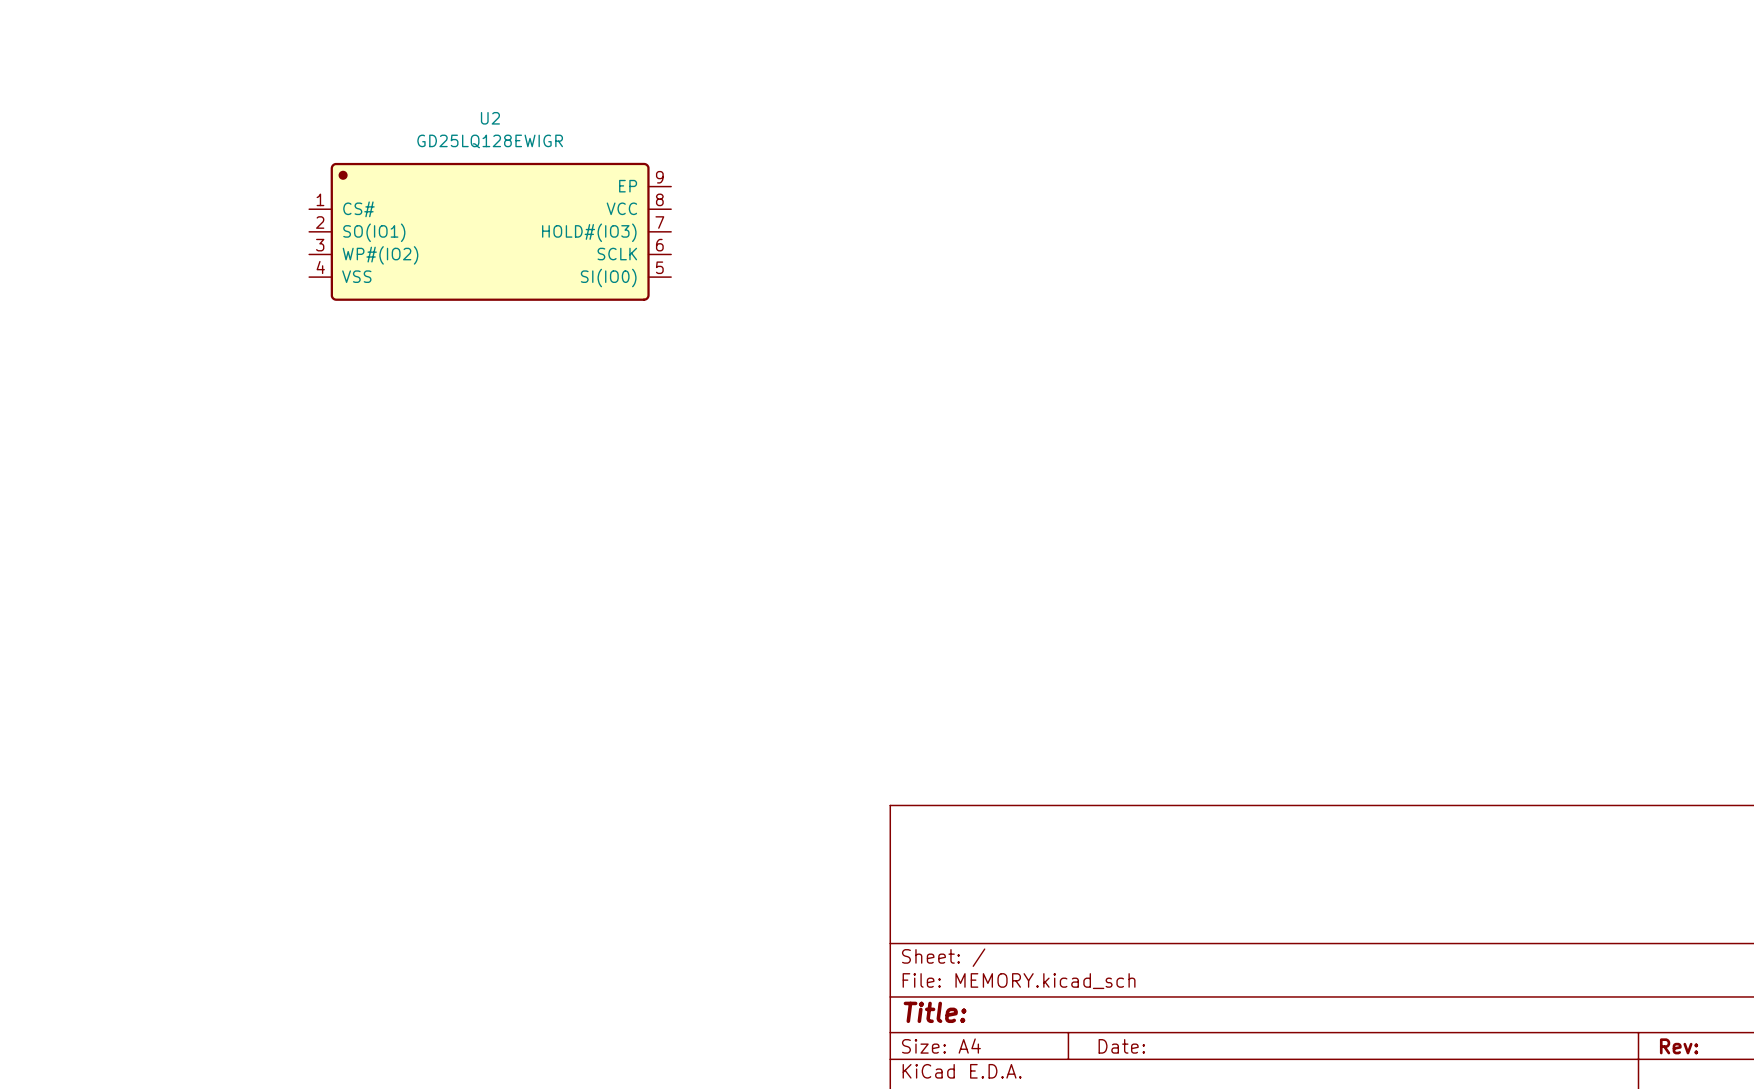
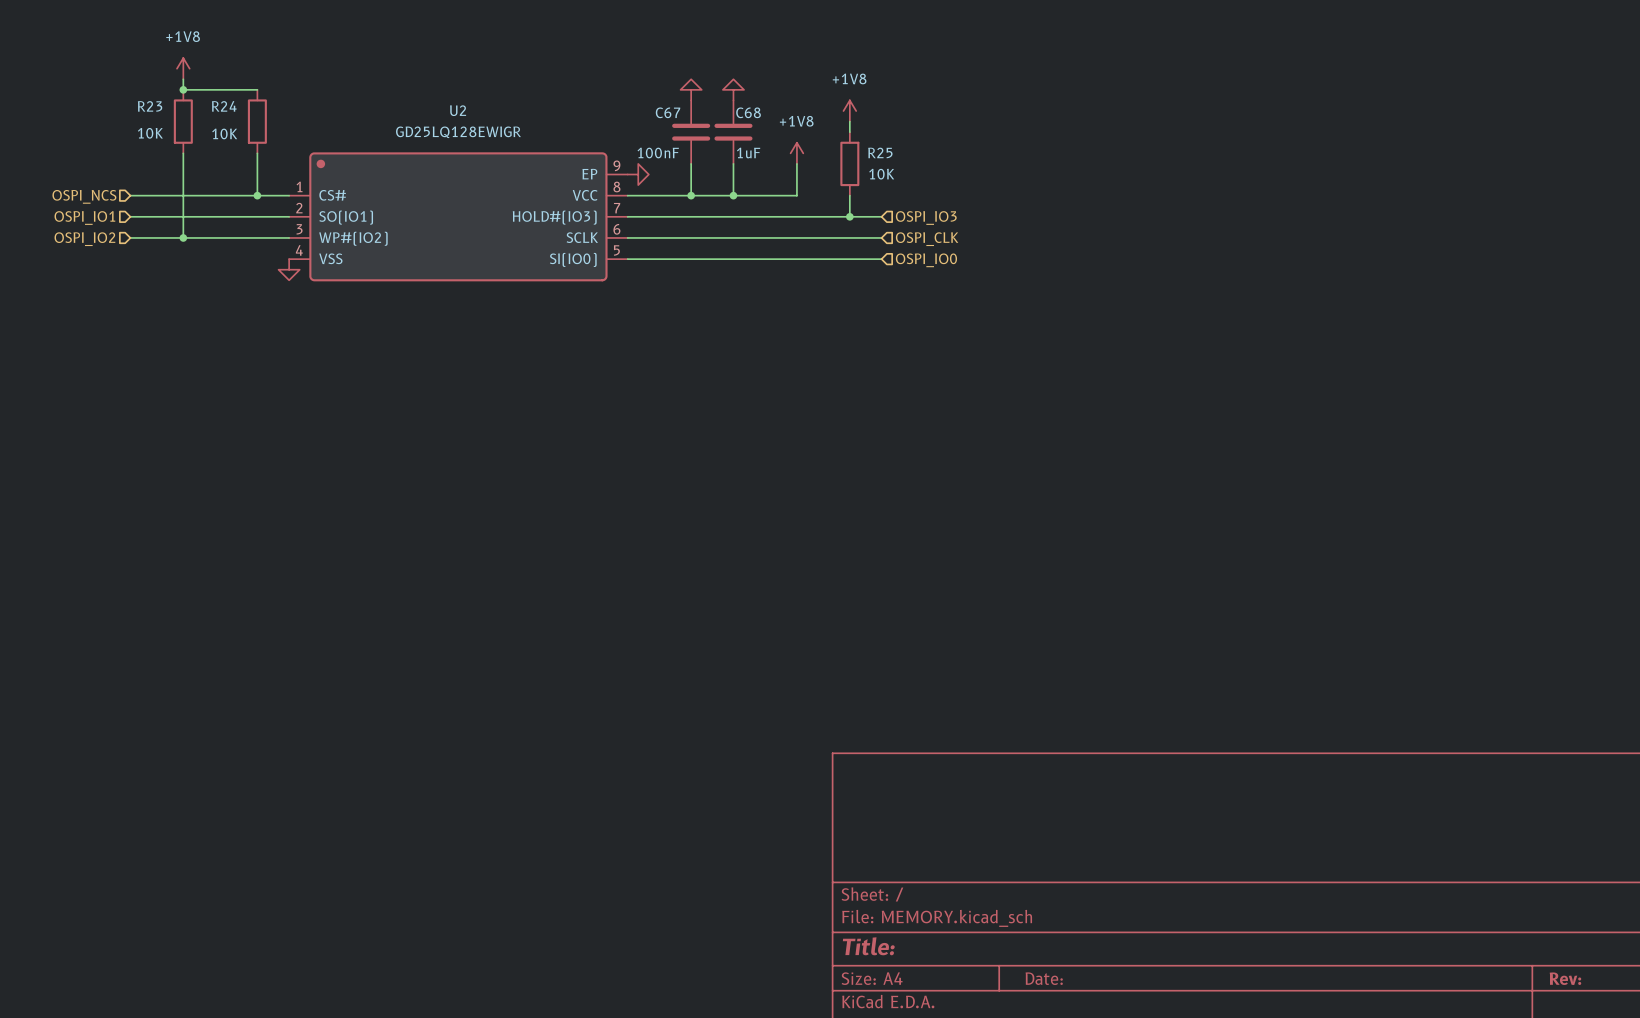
power symbol: none -> +1V8 (183, 68)
wire: none -> (183, 79) (183, 89) (257, 89)
junction: none -> (183, 89)
power symbol: none -> (691, 89)
power symbol: none -> (733, 89)
power symbol: none -> +1V8 (849, 111)
R23: none -> 10K (183, 121)
R24: none -> 10K (257, 121)
wire: none -> (849, 121) (849, 132)
C67: none -> 100nF (691, 132)
C68: none -> 1uF (733, 132)
wire: none -> (183, 153) (183, 237)
wire: none -> (257, 153) (257, 195)
power symbol: none -> +1V8 (796, 153)
wire: none -> (691, 163) (691, 195)
wire: none -> (733, 163) (733, 195)
wire: none -> (796, 163) (796, 195) (627, 195)
R25: none -> 10K (849, 163)
power symbol: none -> (638, 174)
hierarchical label: none -> OSPI_NCS (84, 196)
wire: none -> (130, 195) (289, 195)
junction: none -> (257, 195)
junction: none -> (691, 195)
junction: none -> (733, 195)
wire: none -> (849, 195) (849, 216)
hierarchical label: none -> OSPI_IO1 (84, 218)
wire: none -> (130, 216) (289, 216)
wire: none -> (627, 216) (881, 216)
junction: none -> (849, 216)
hierarchical label: none -> OSPI_IO3 (926, 218)
hierarchical label: none -> OSPI_IO2 (84, 239)
wire: none -> (130, 237) (289, 237)
junction: none -> (183, 237)
wire: none -> (627, 237) (881, 237)
hierarchical label: none -> OSPI_CLK (927, 239)
wire: none -> (627, 259) (881, 259)
hierarchical label: none -> OSPI_IO0 (926, 260)
power symbol: none -> (289, 269)

